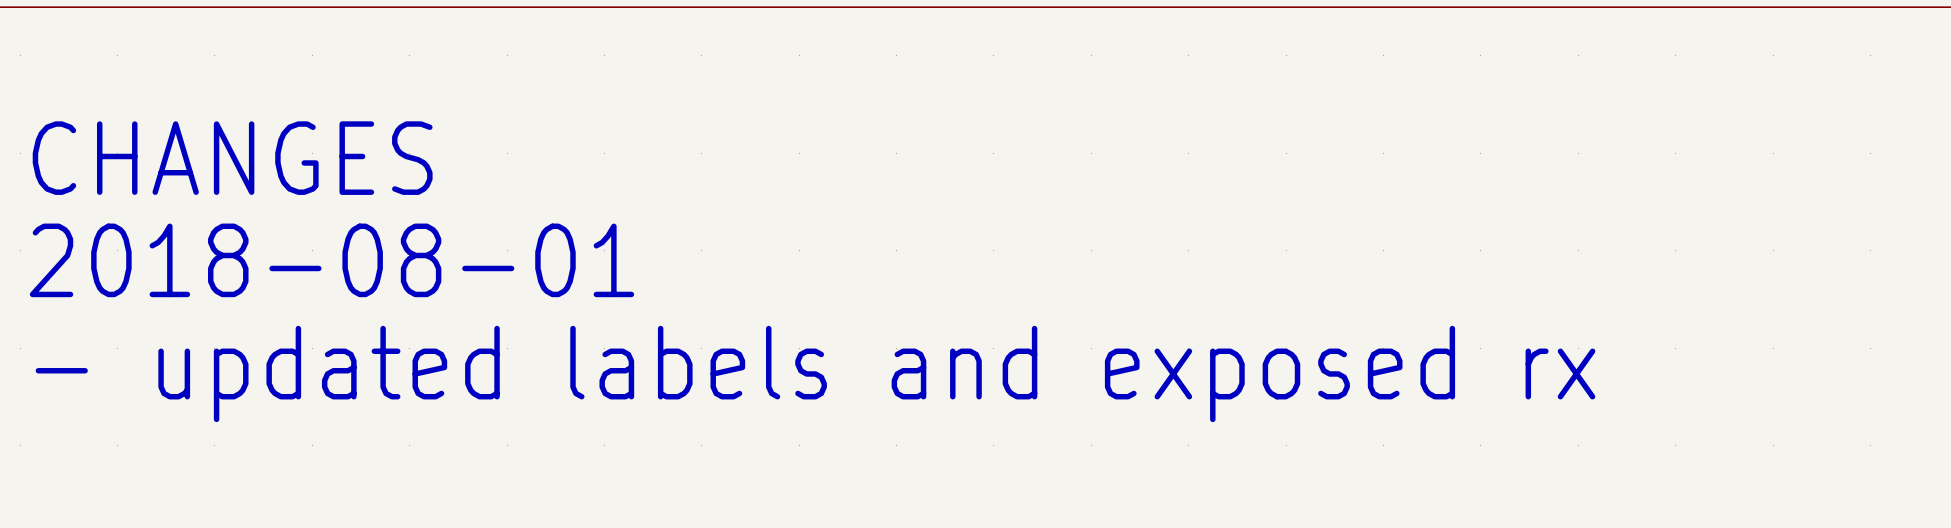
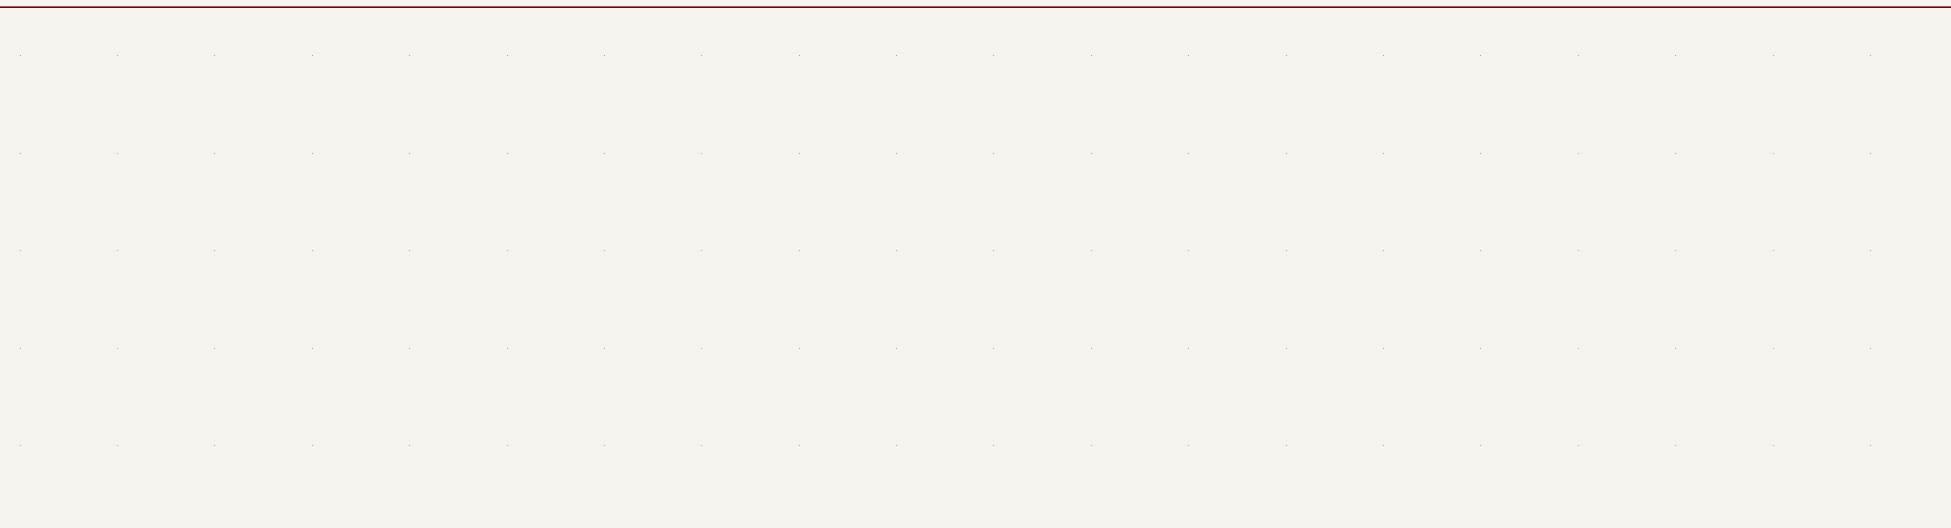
text: CHANGES (232, 158) -> none
text: 2018-08-01 (331, 260) -> none
text: - updated labels and exposed rx (815, 373) -> none

